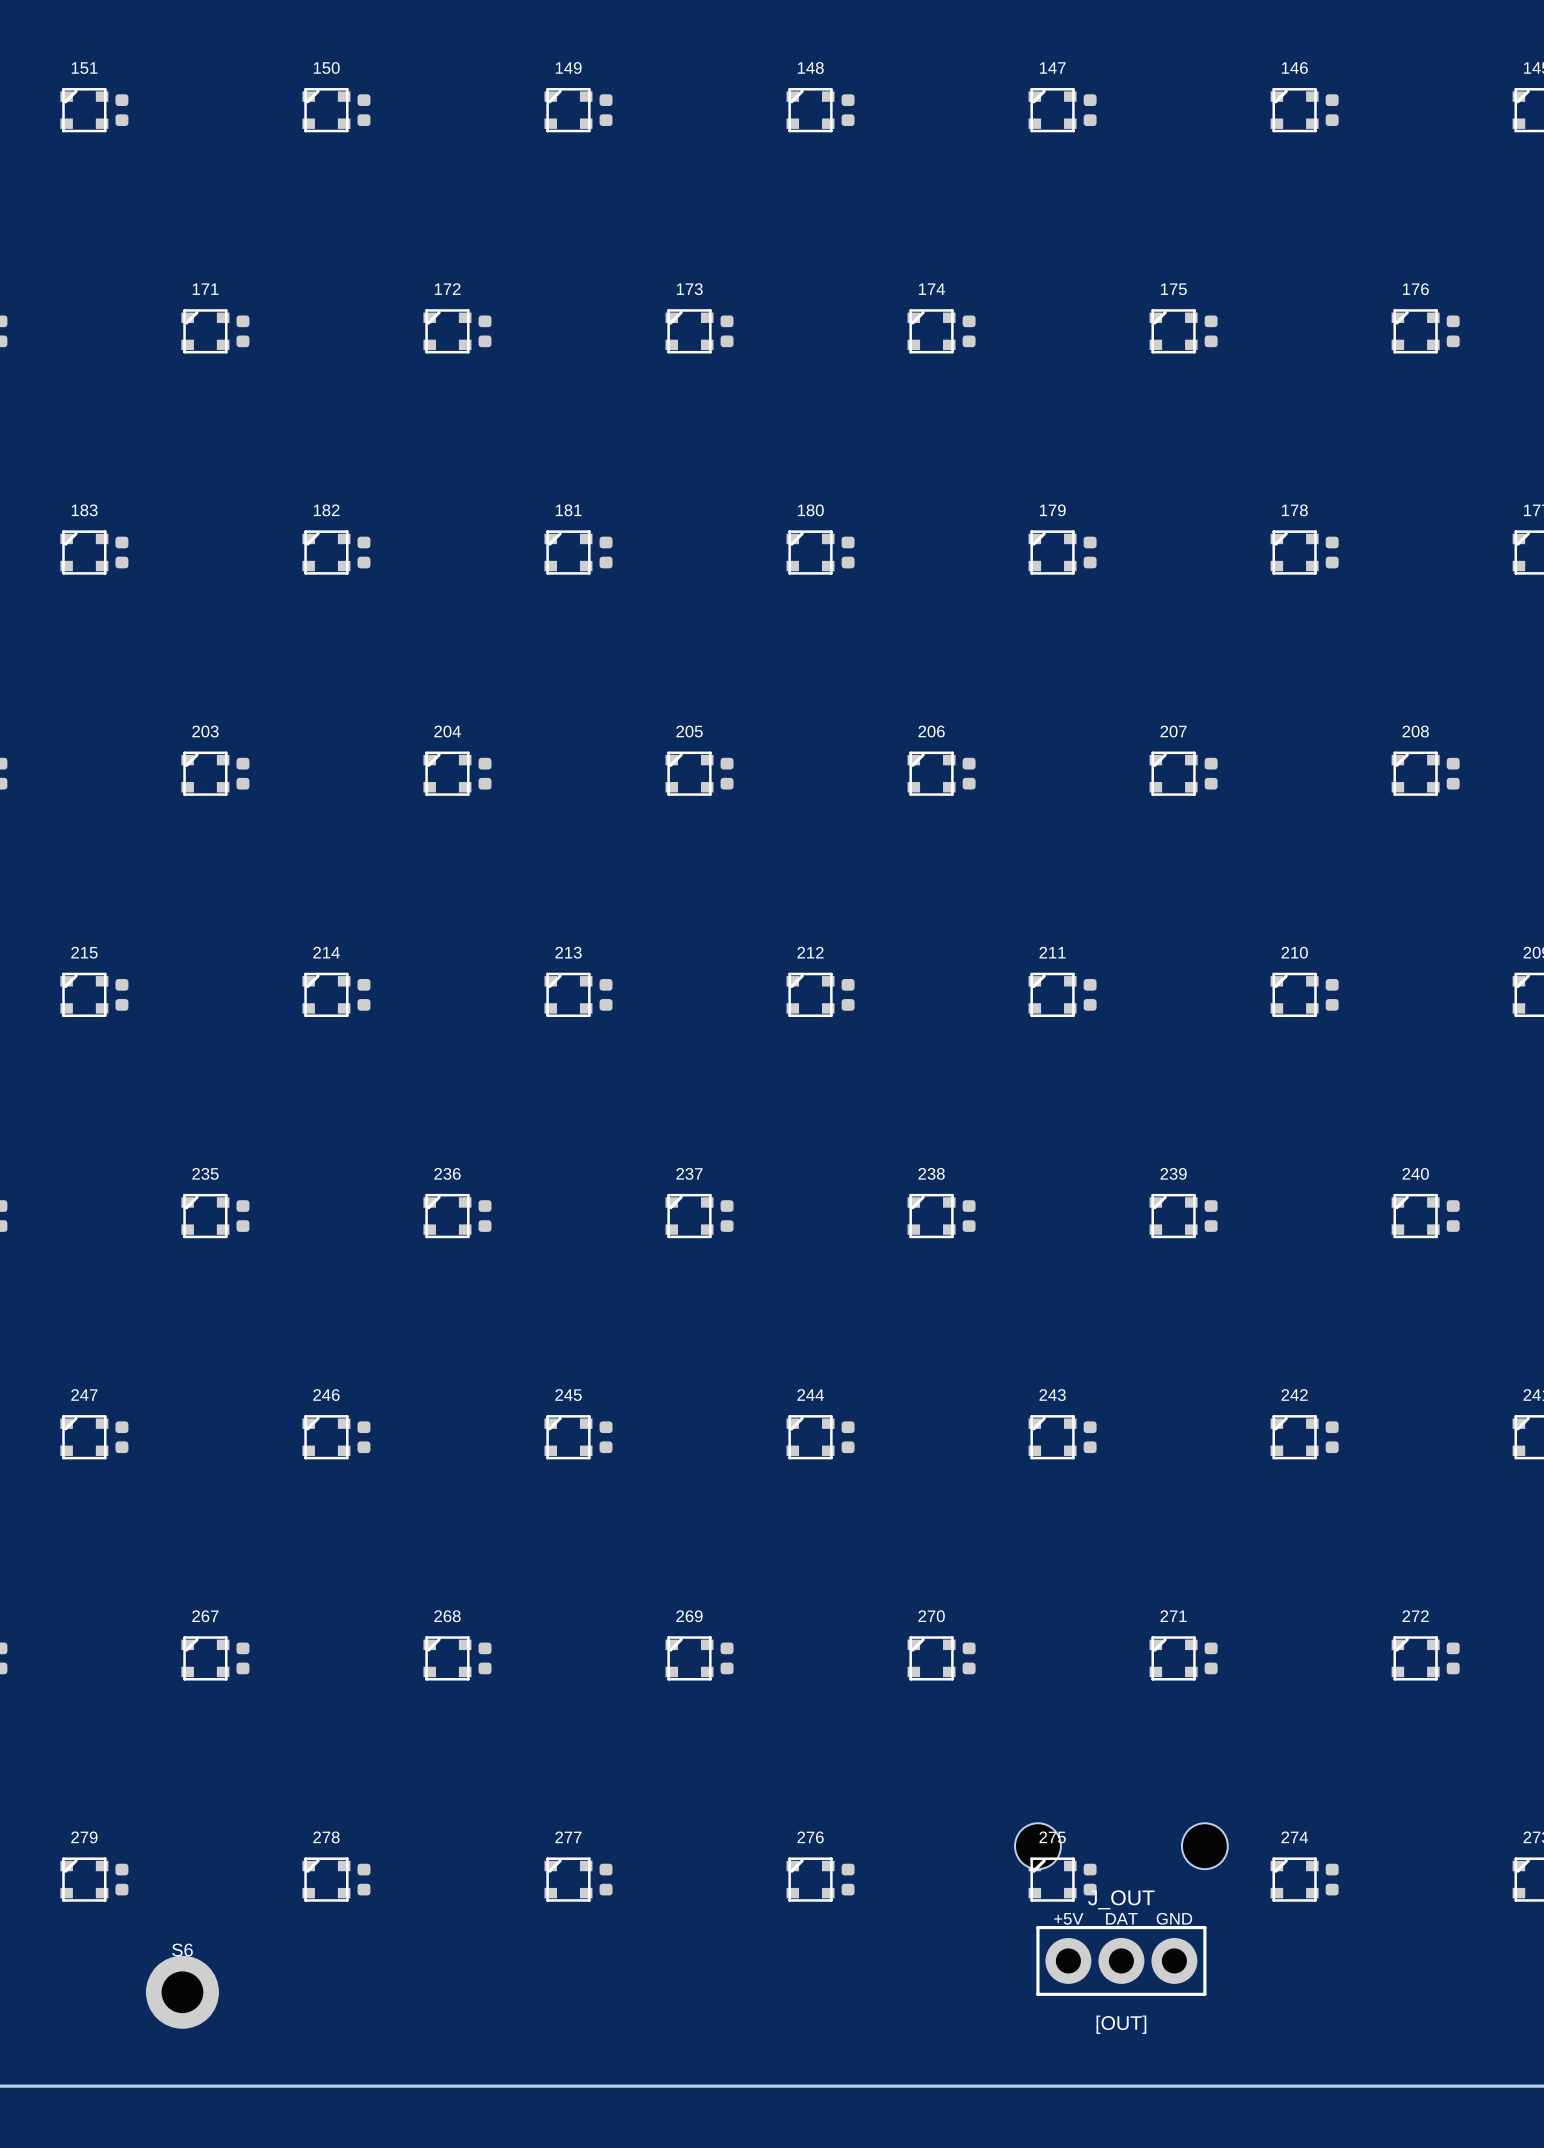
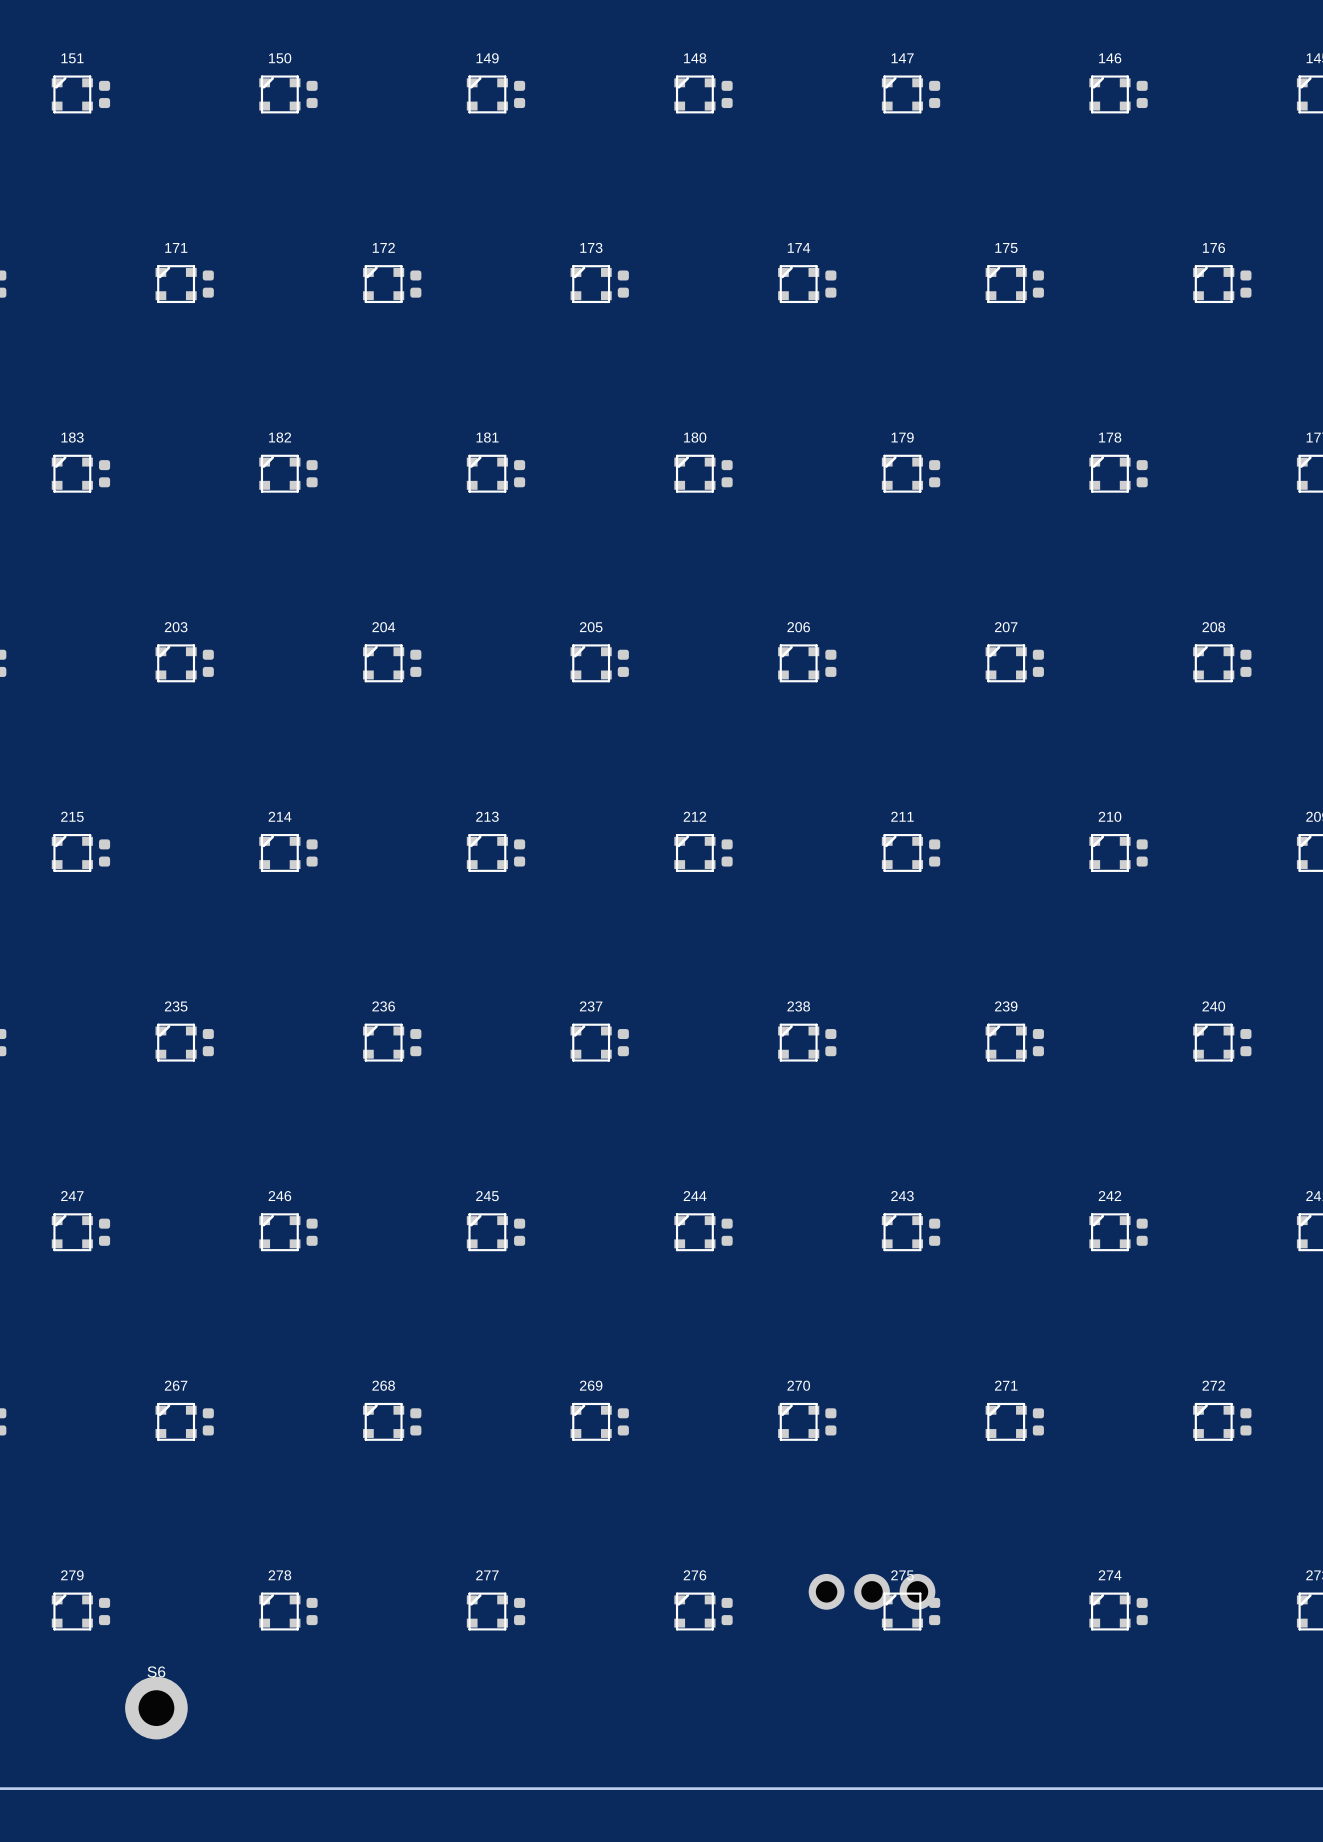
part: (1037, 1846) -> none
part: (1204, 1846) -> none
part: none -> (826, 1591)
part: none -> (872, 1591)
part: none -> (917, 1591)
J_OUT: (1121, 1960) -> none

